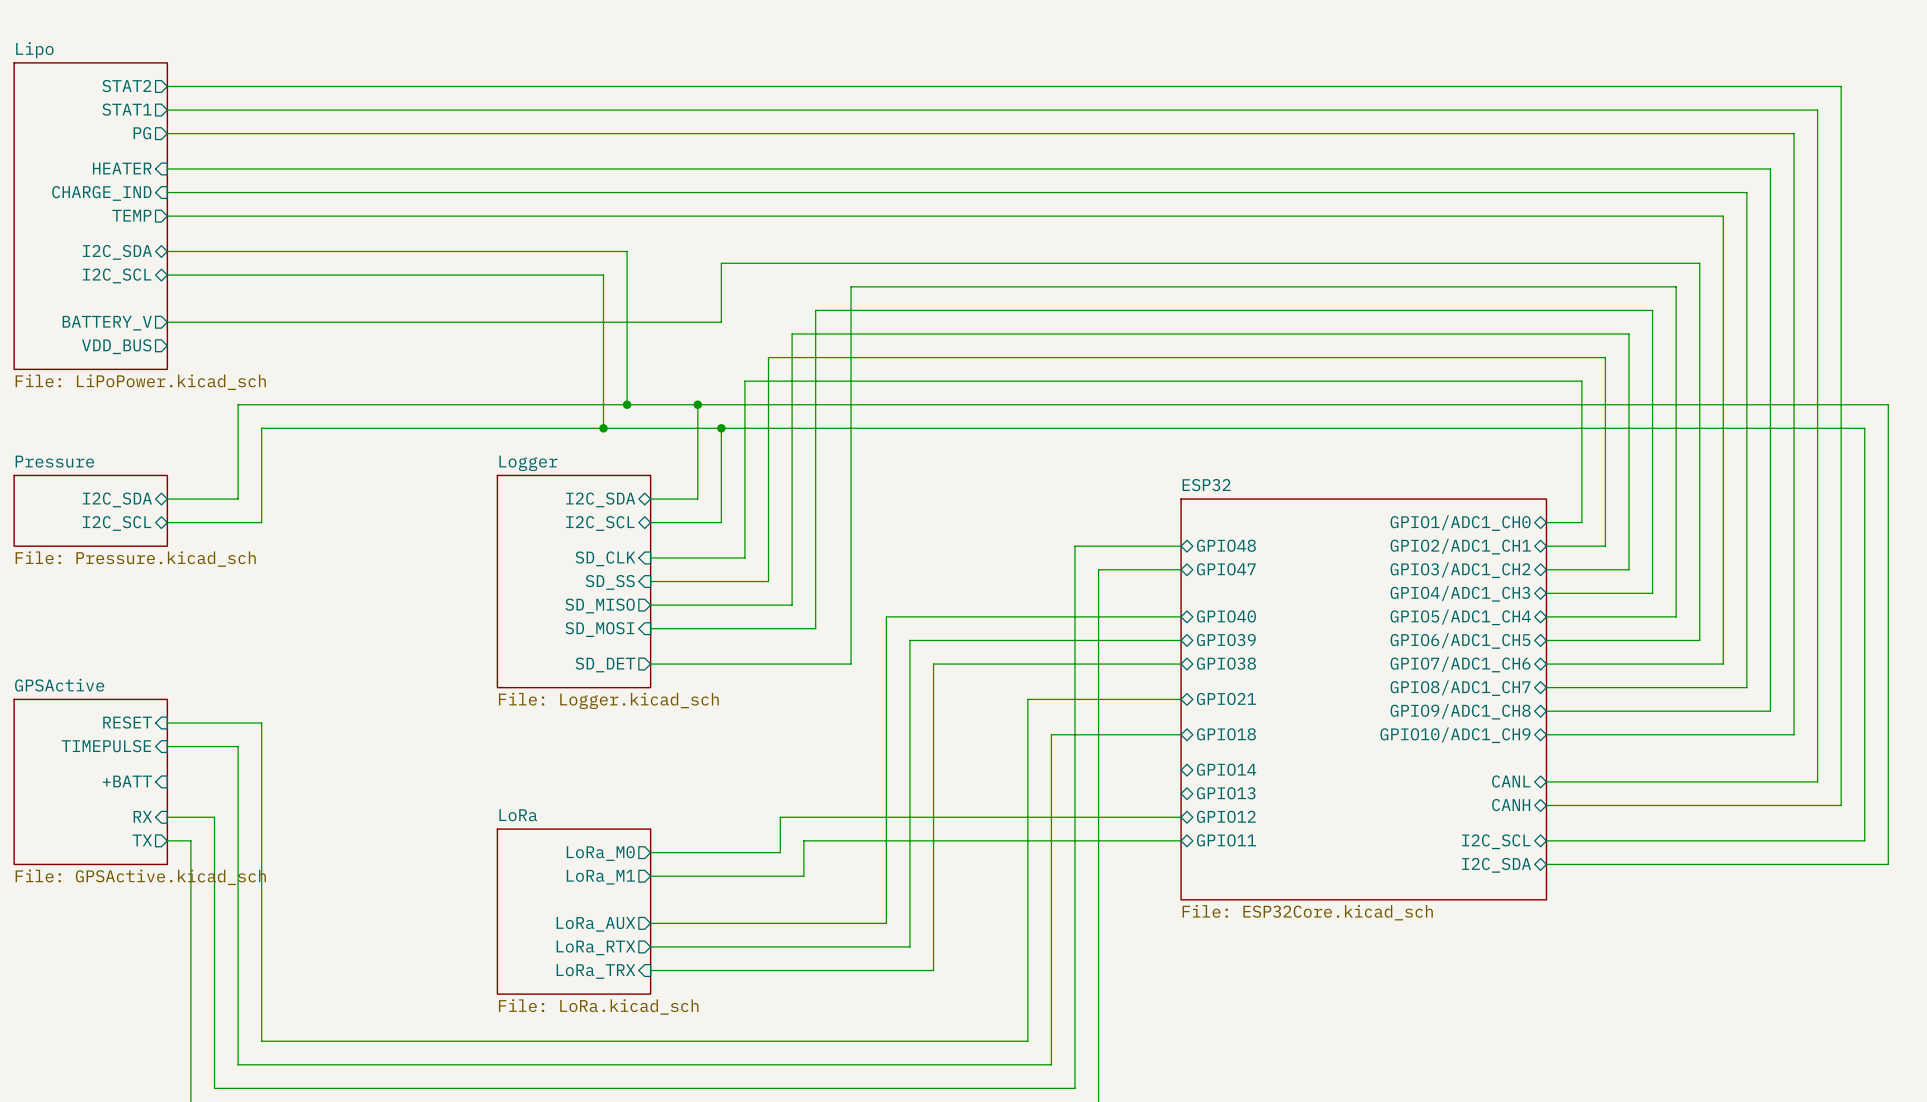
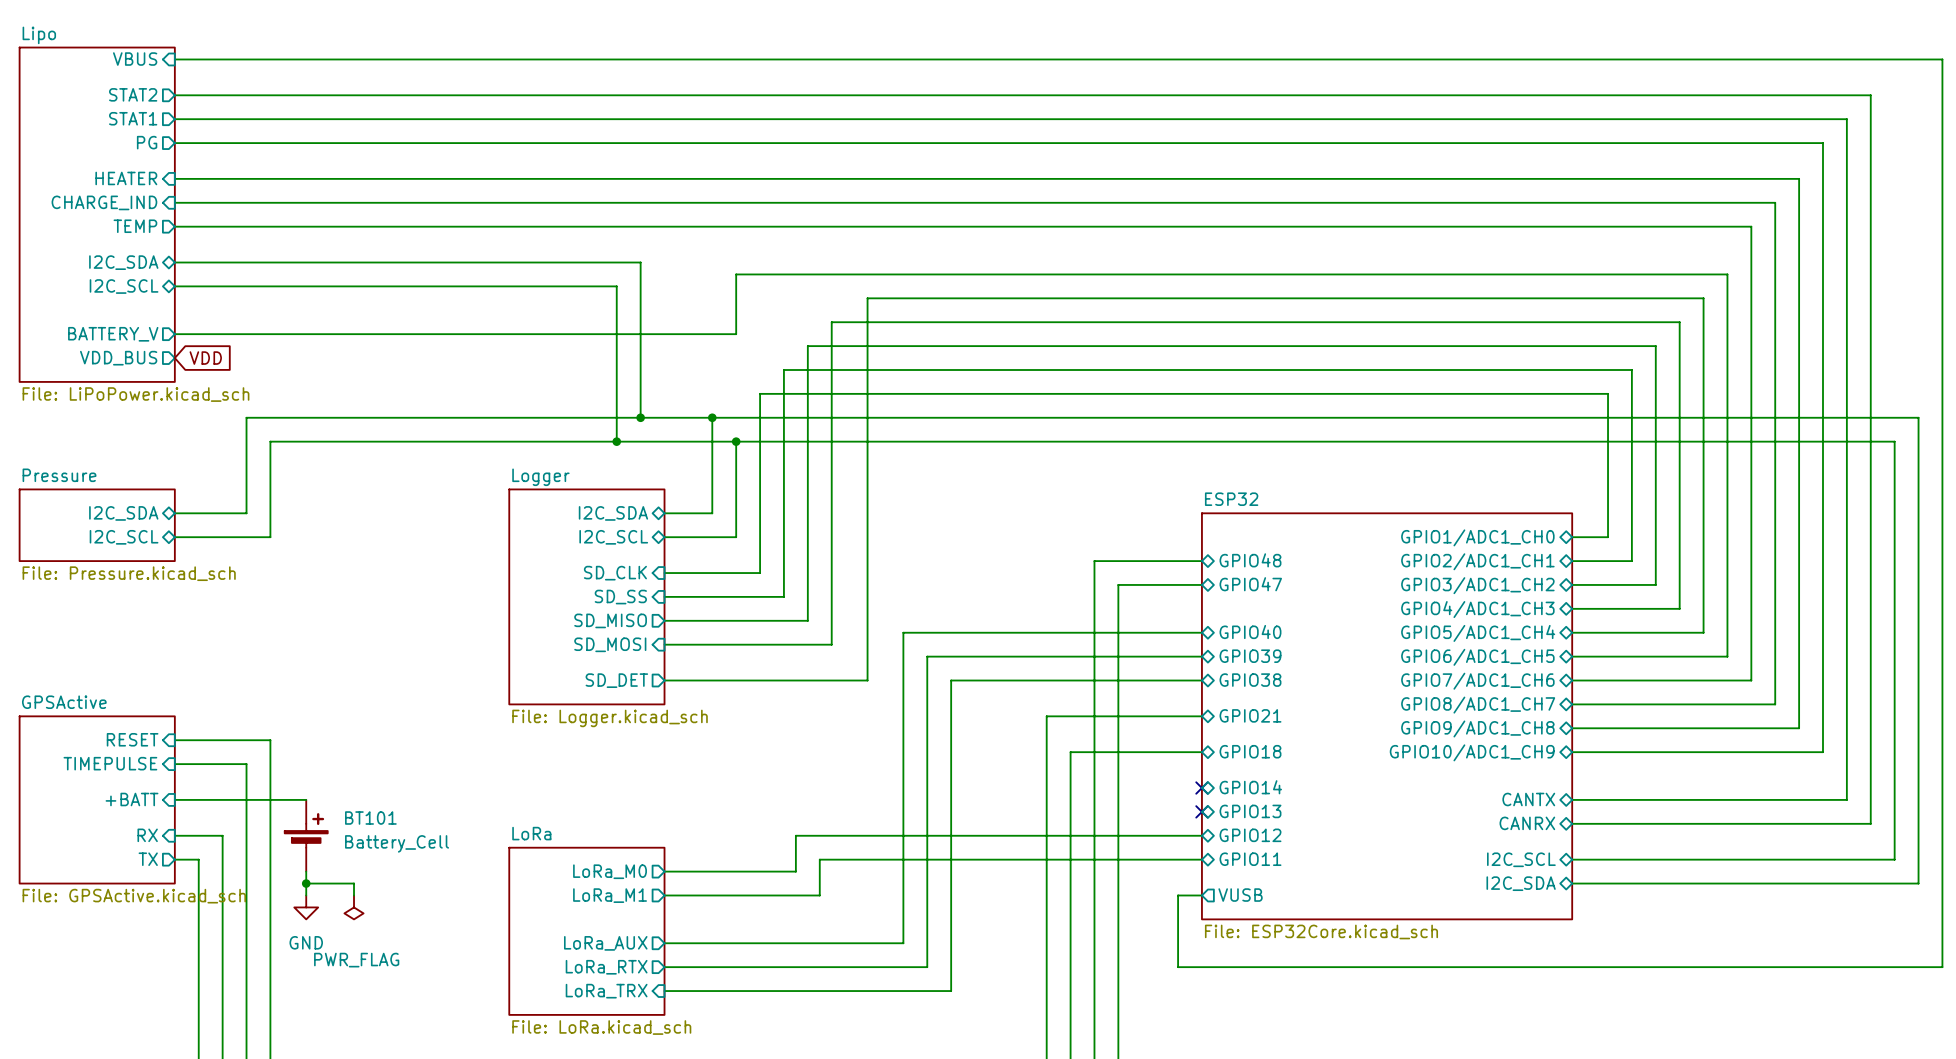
sheet pin: none -> VBUS (135, 59)
wire: none -> (174, 59) (1942, 59) (1942, 967) (1178, 967) (1178, 895) (1201, 895)
sheet Lipo: none -> File: LiPoPower.kicad_sch (97, 214)
sheet Lipo: File: LiPoPower.kicad_sch (90, 216) -> none
global label: none -> VDD (205, 358)
no-connect mark: none -> (1201, 788)
wire: none -> (174, 799) (306, 799)
sheet pin: CANL (1511, 781) -> CANTX (1528, 799)
no-connect mark: none -> (1201, 811)
sheet pin: CANH (1511, 805) -> CANRX (1527, 823)
BT101: none -> Battery_Cell (306, 835)
wire: none -> (306, 871) (306, 895)
wire: none -> (306, 883) (354, 883) (354, 895)
junction: none -> (306, 883)
sheet pin: none -> VUSB (1240, 895)
power symbol: none -> GND (306, 907)
power symbol: none -> PWR_FLAG (354, 907)

